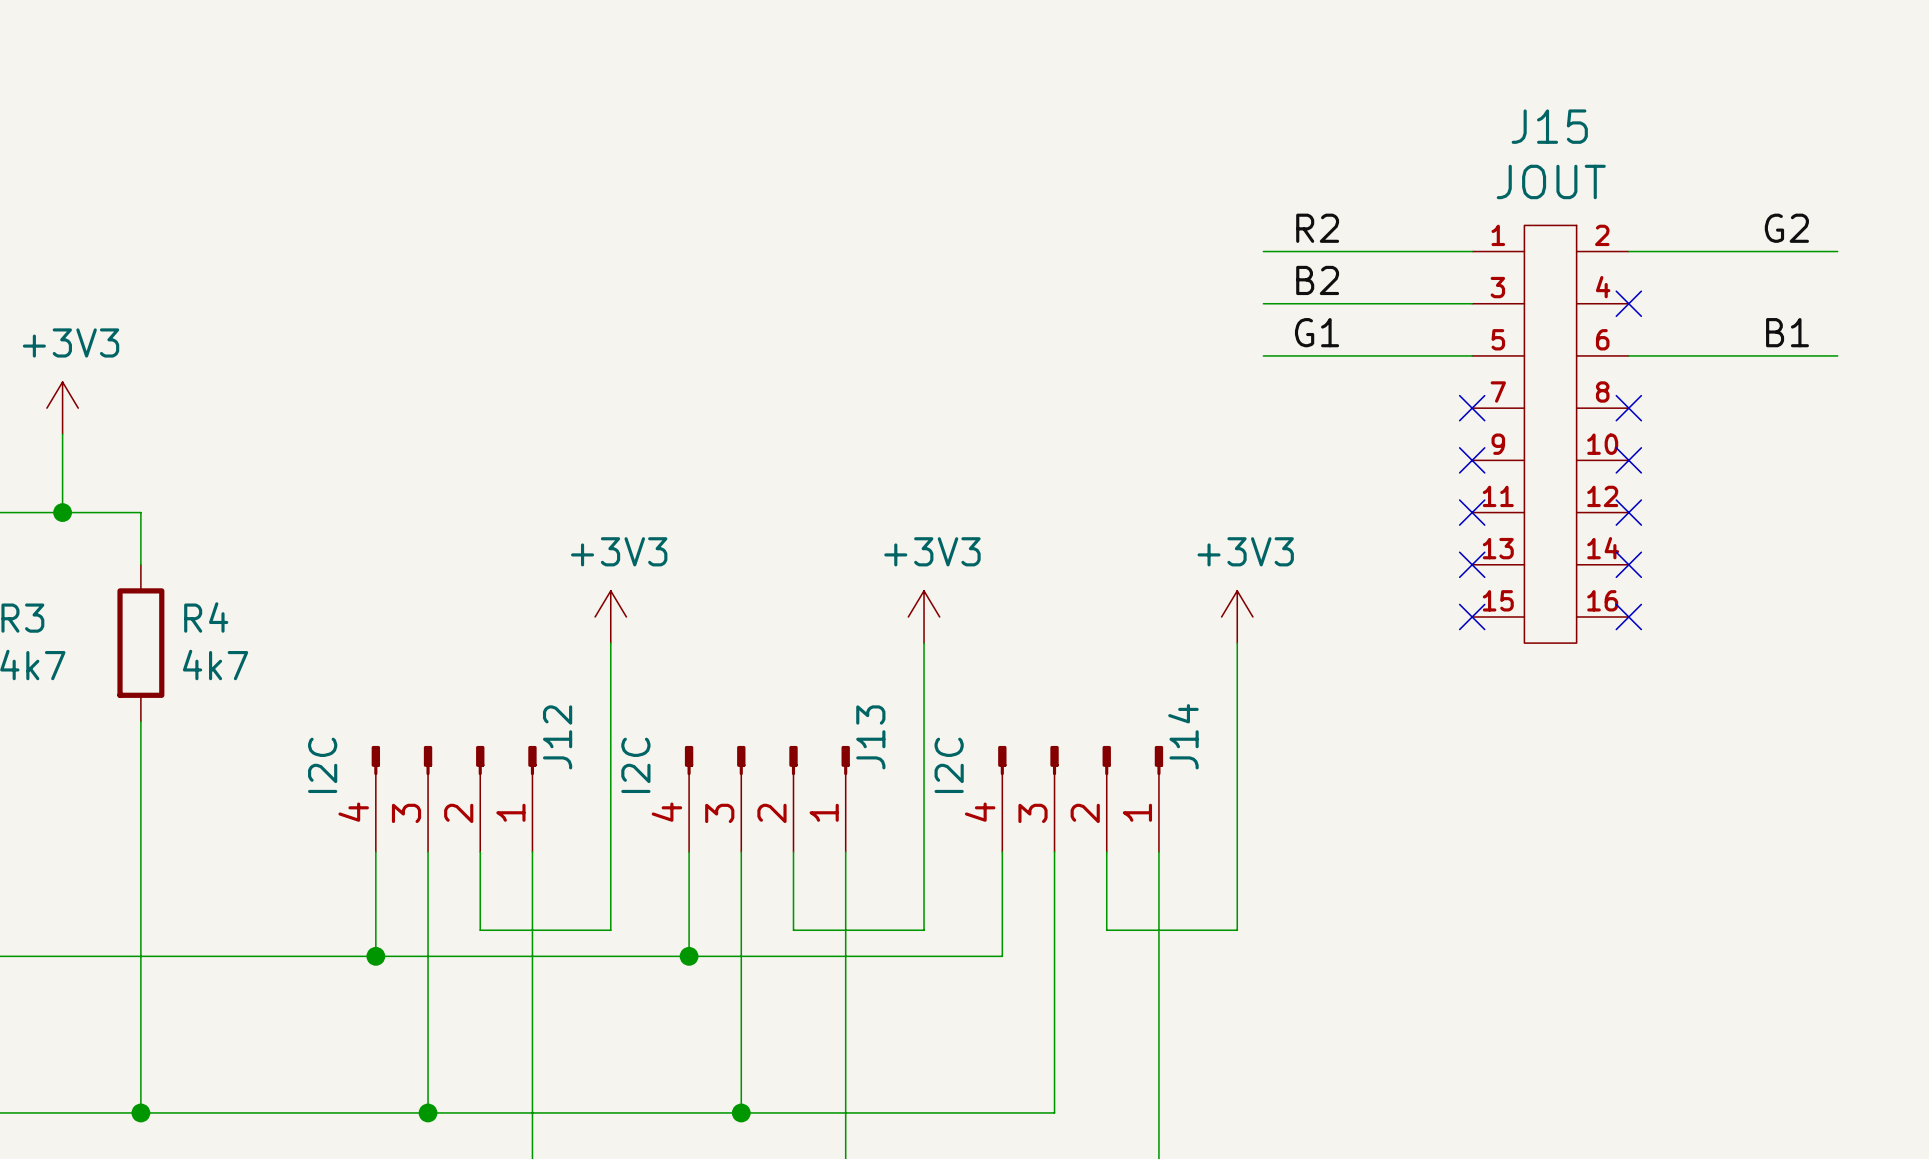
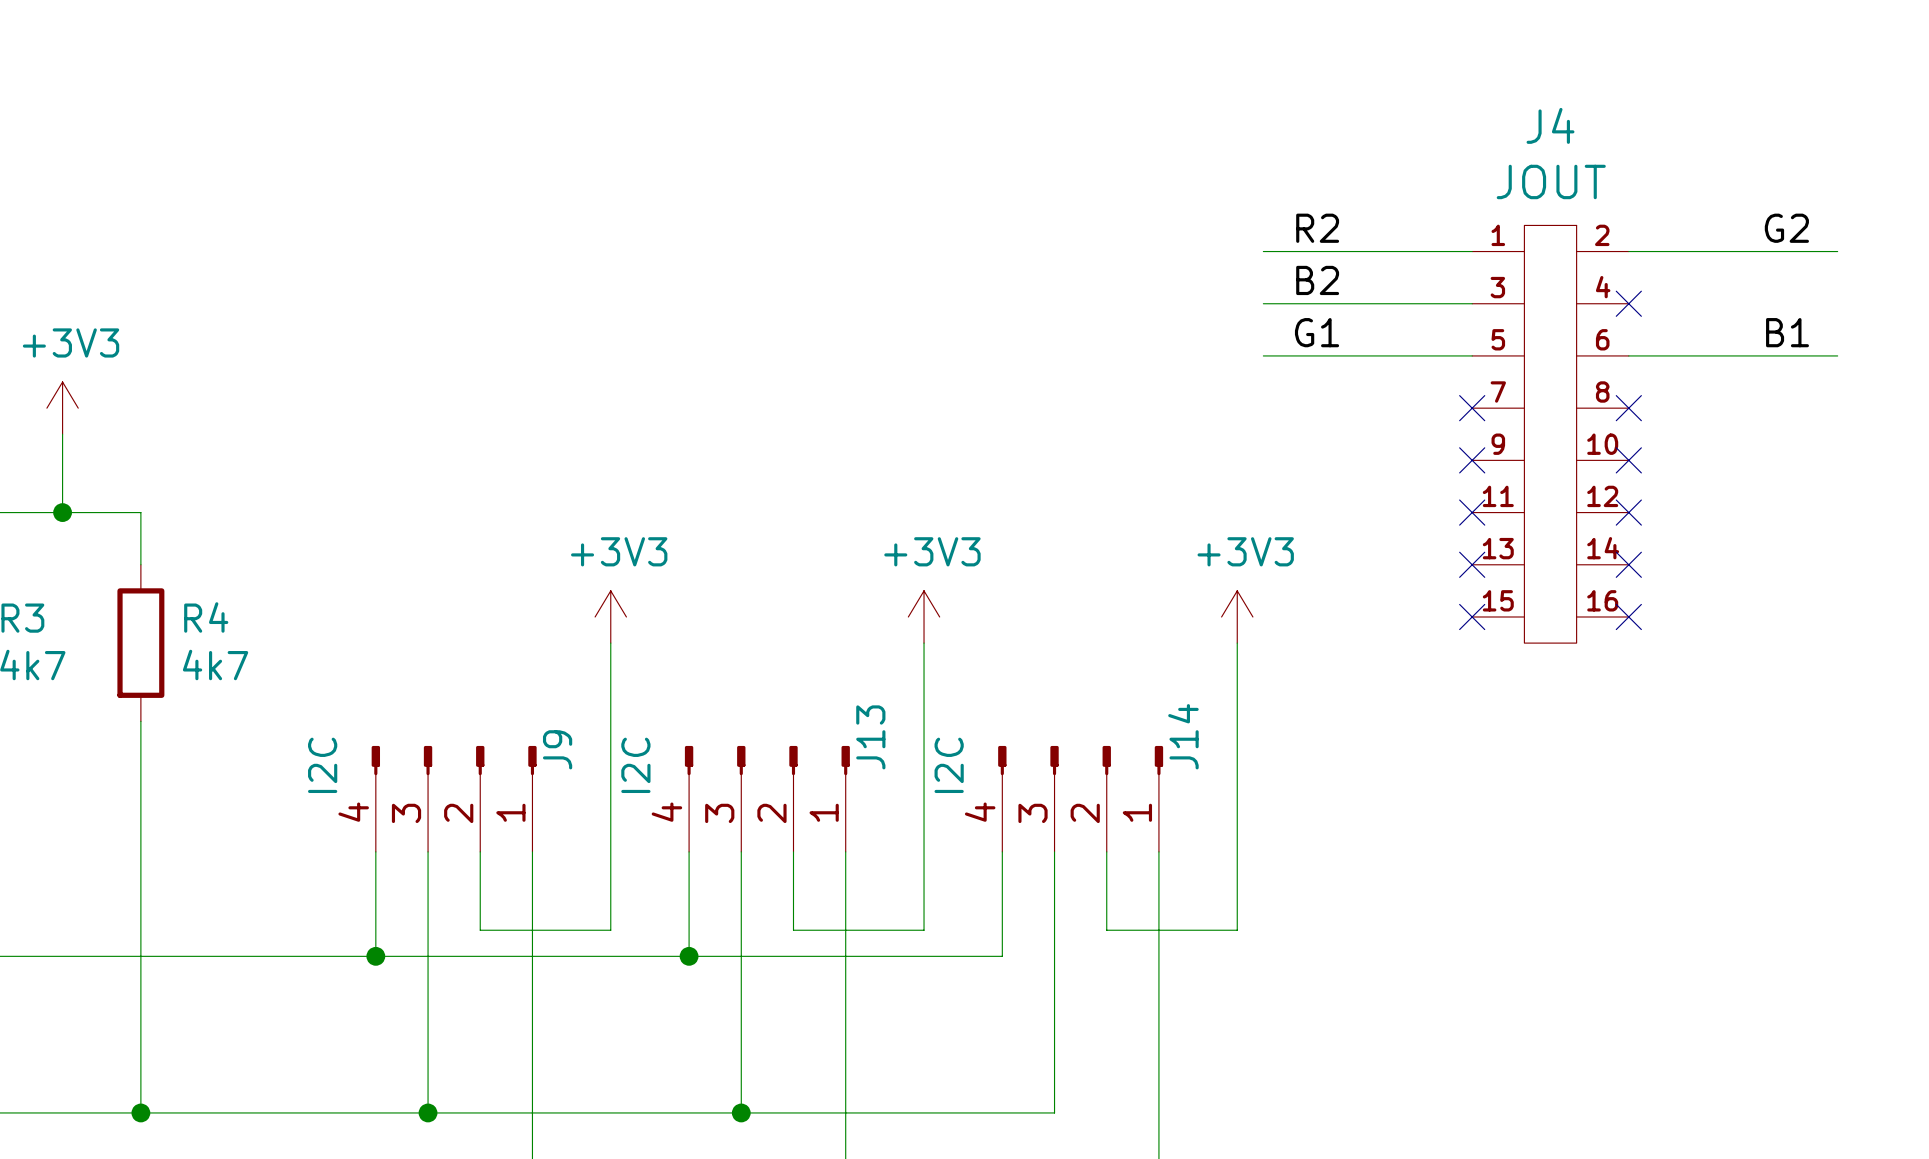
J15 name: J15 (1549, 126) -> J4 (1550, 125)
J12 name: J12 (557, 737) -> J9 (557, 749)

